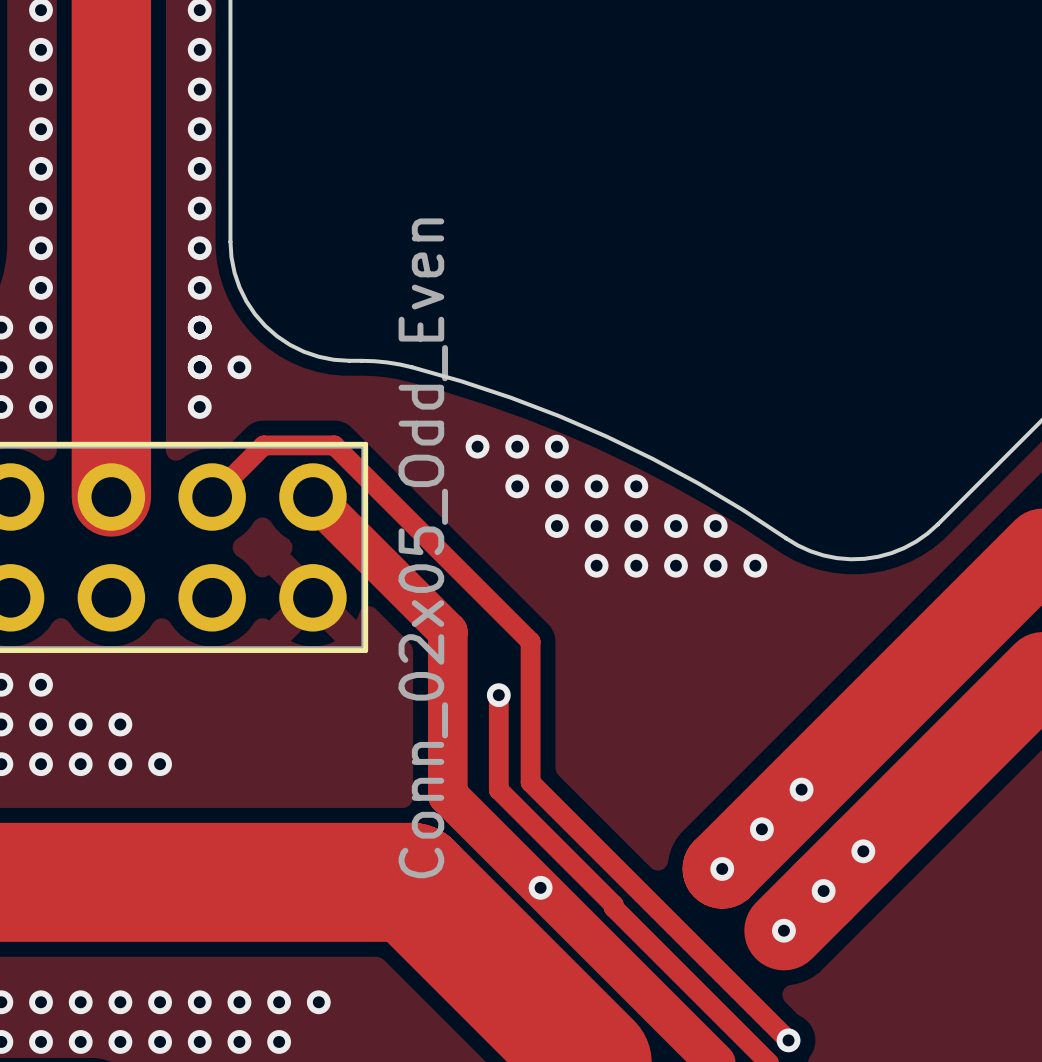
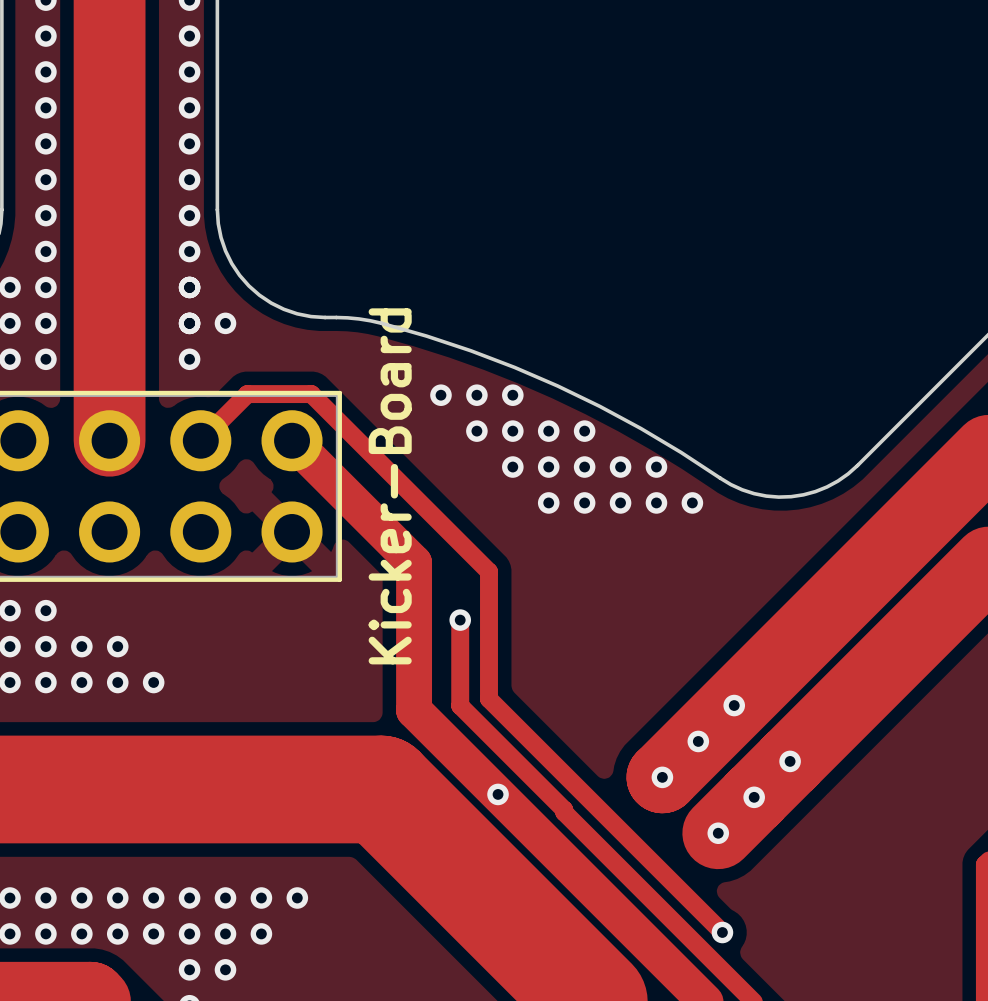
part value: Conn_02x05_Odd_Even (423, 548) -> Kicker-Board (390, 486)

